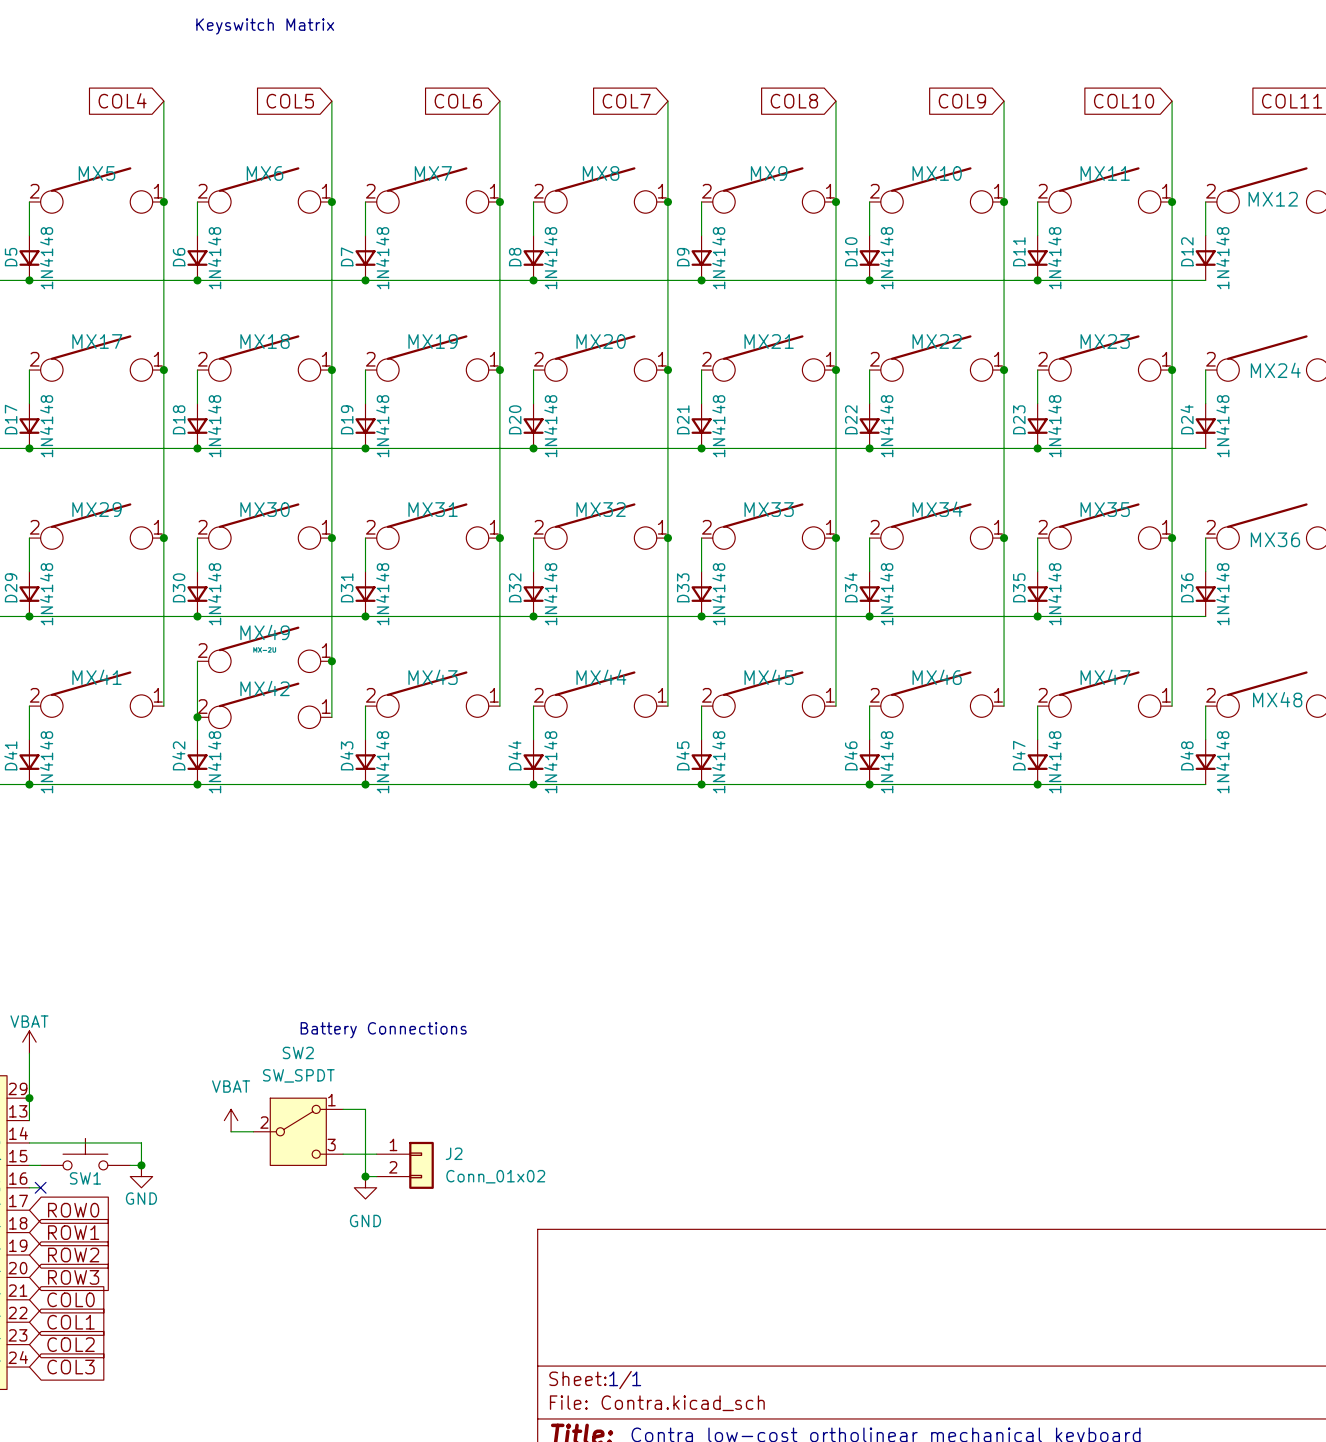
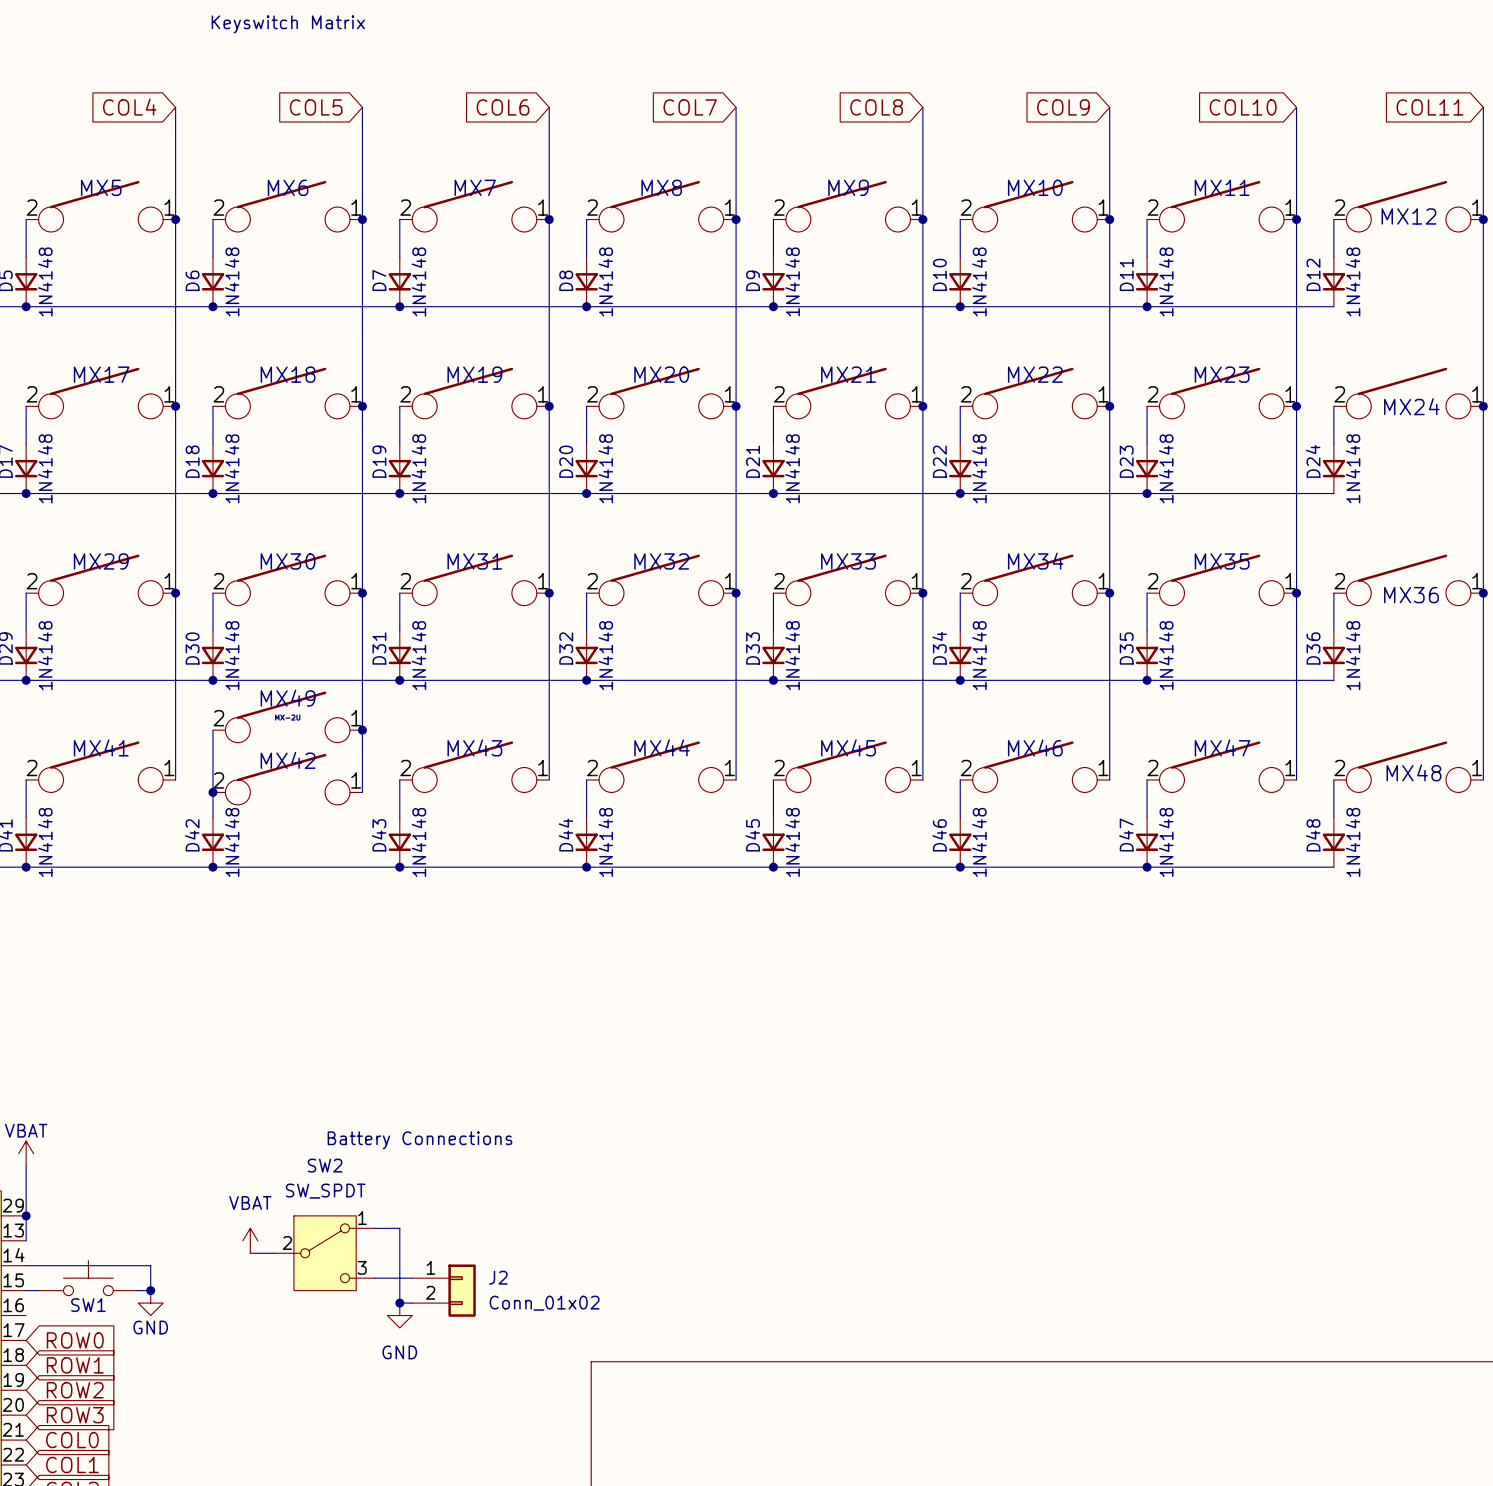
wire: (29, 1187) (40, 1187) -> none
no-connect mark: (40, 1187) -> none

